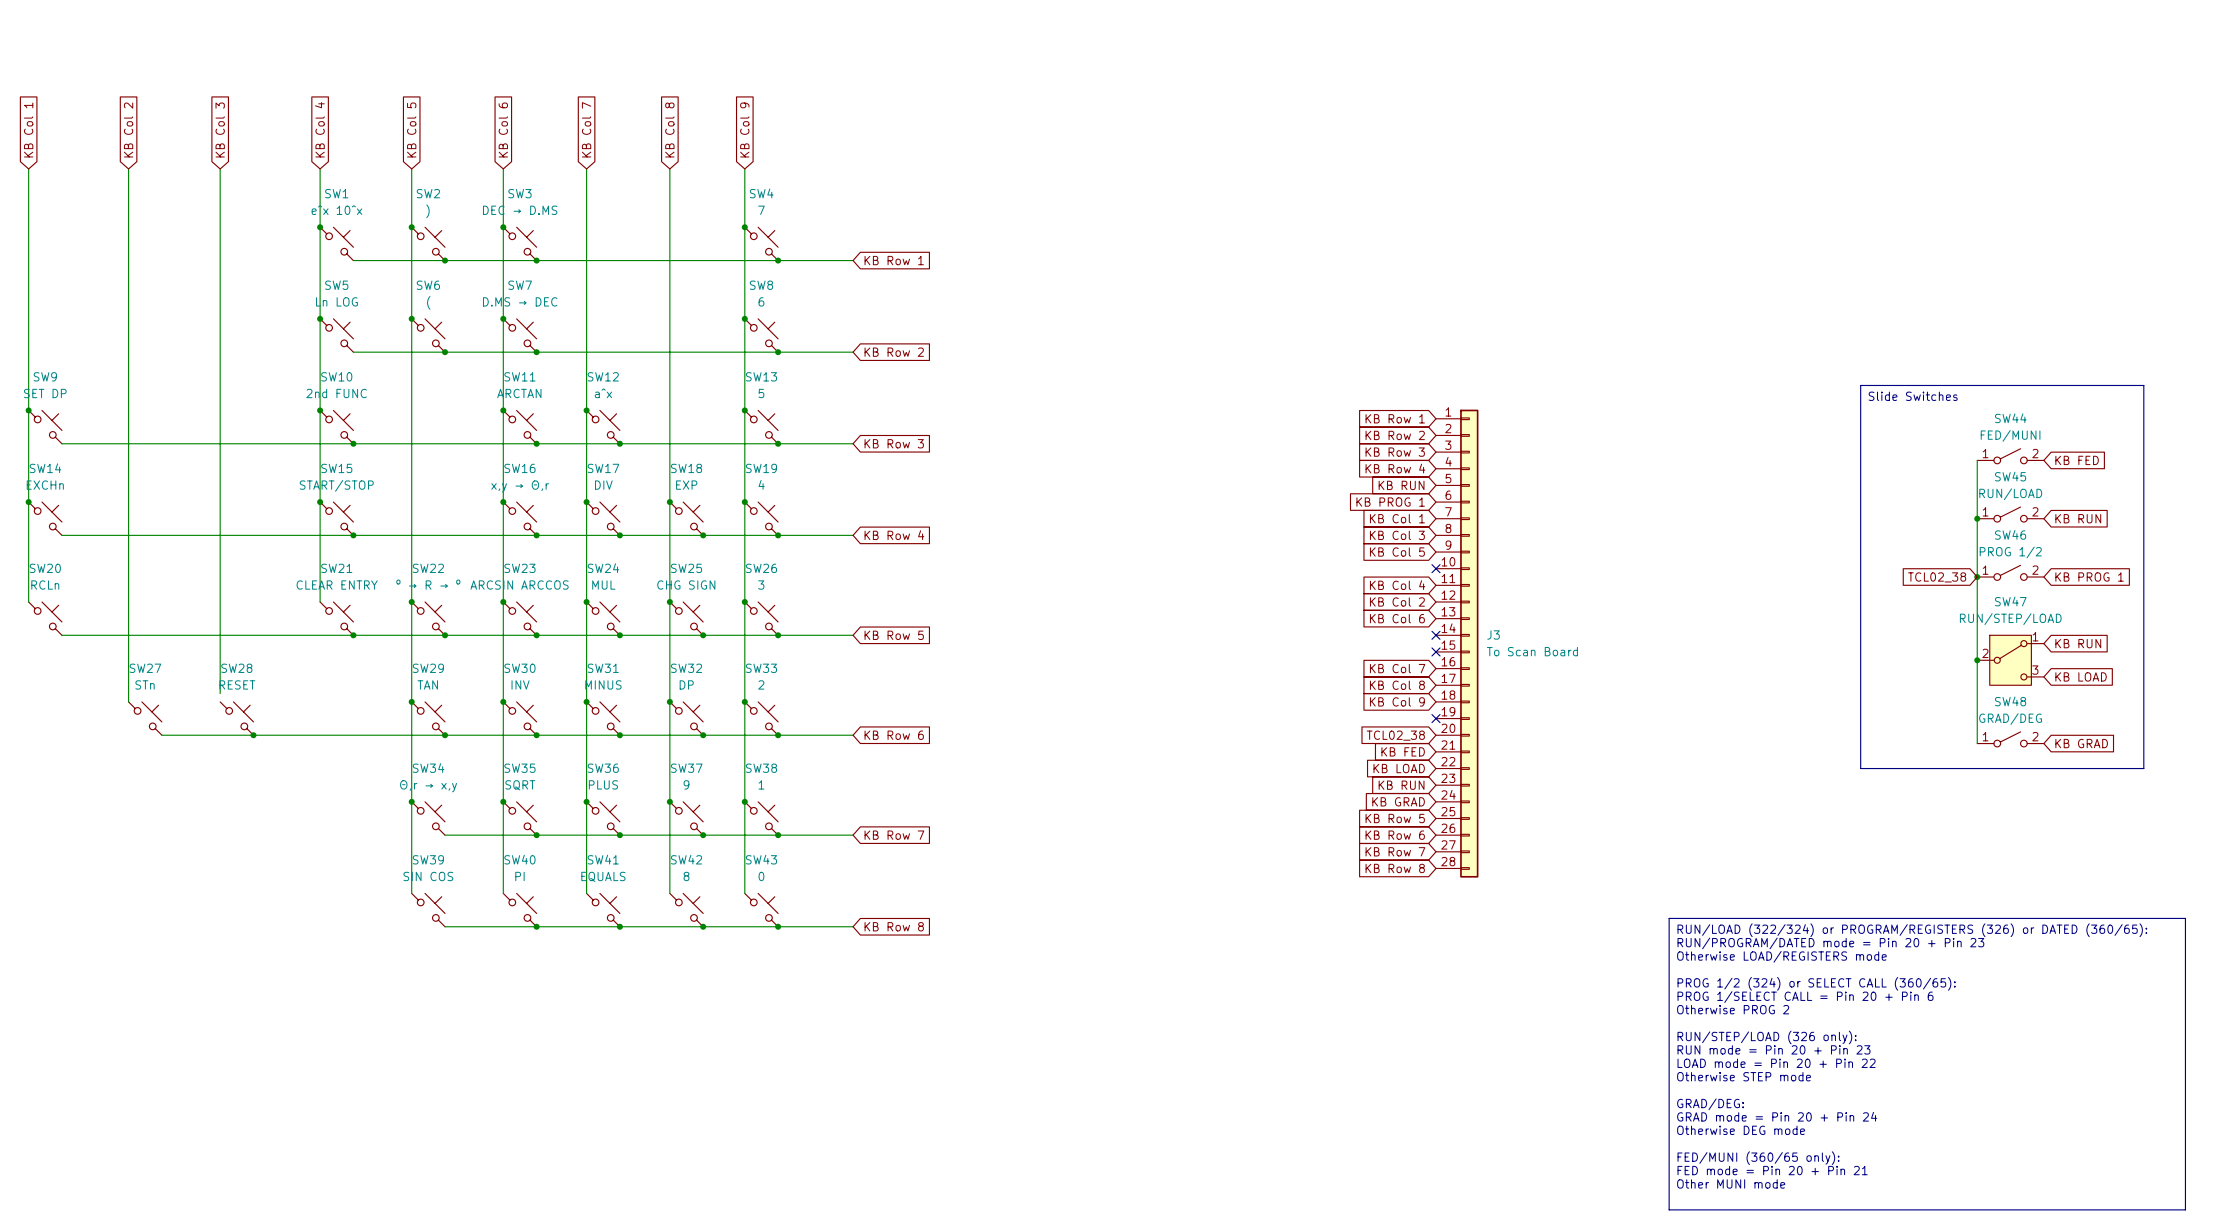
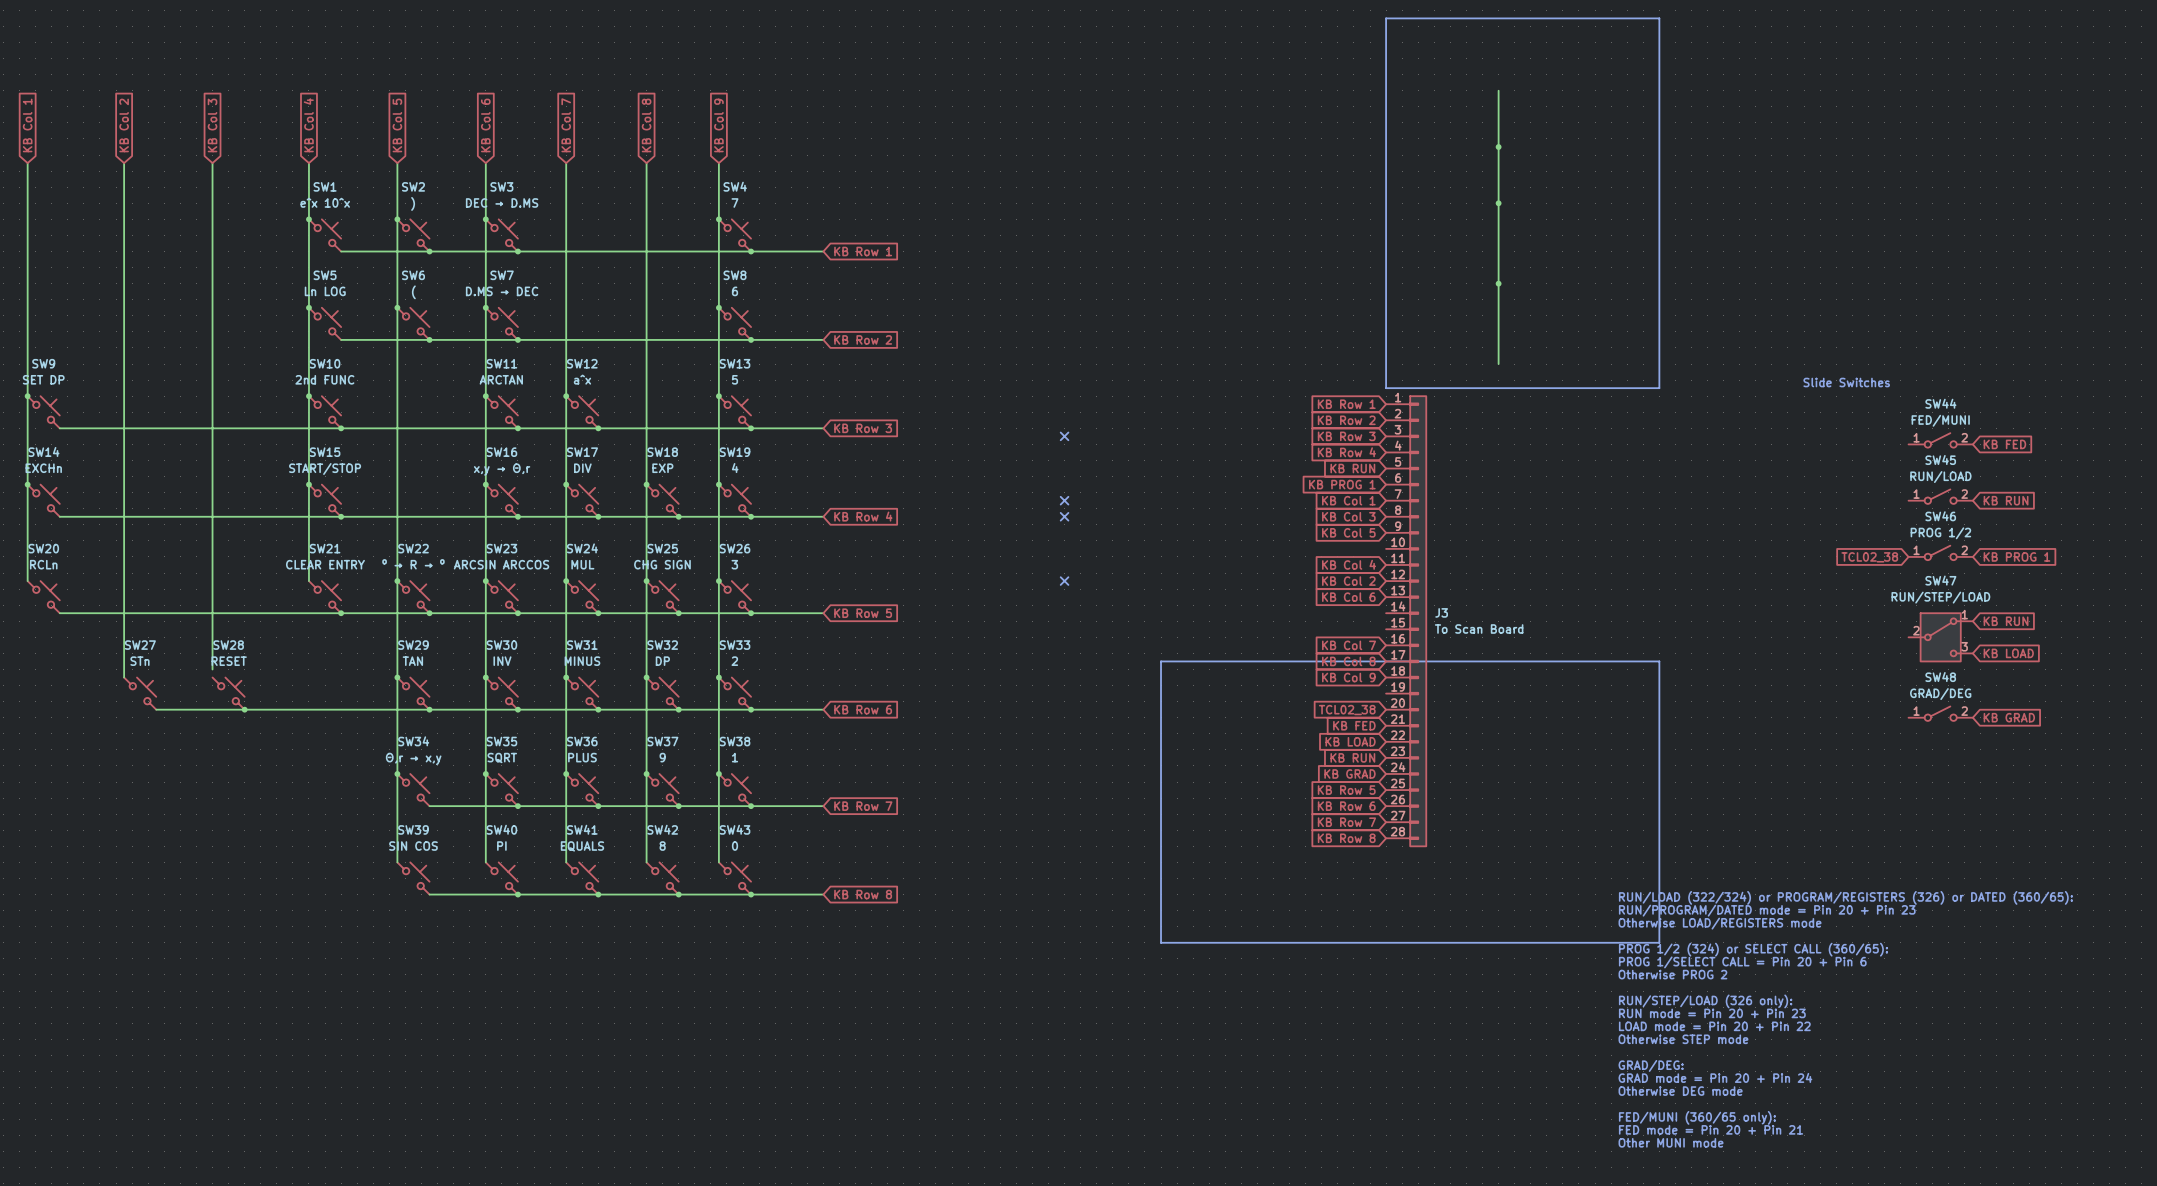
line: none -> (1386, 18) (1659, 18) (1659, 388) (1386, 388) (1386, 18)
wire: none -> (1498, 90) (1498, 364)
junction: none -> (1498, 147)
junction: none -> (1498, 203)
junction: none -> (1498, 283)
line: (1860, 385) (2143, 385) (2143, 768) (1860, 768) (1860, 385) -> none
no-connect mark: none -> (1064, 436)
wire: (1977, 460) (1977, 743) -> none
no-connect mark: none -> (1064, 500)
junction: (1977, 518) -> none
no-connect mark: none -> (1064, 516)
no-connect mark: (1435, 568) -> none
junction: (1977, 577) -> none
no-connect mark: none -> (1064, 581)
no-connect mark: (1435, 635) -> none
no-connect mark: (1435, 651) -> none
junction: (1977, 660) -> none
line: none -> (1161, 661) (1659, 661) (1659, 942) (1161, 942) (1161, 661)
no-connect mark: (1435, 718) -> none
line: (1669, 918) (2185, 918) (2185, 1209) (1669, 1209) (1669, 918) -> none

